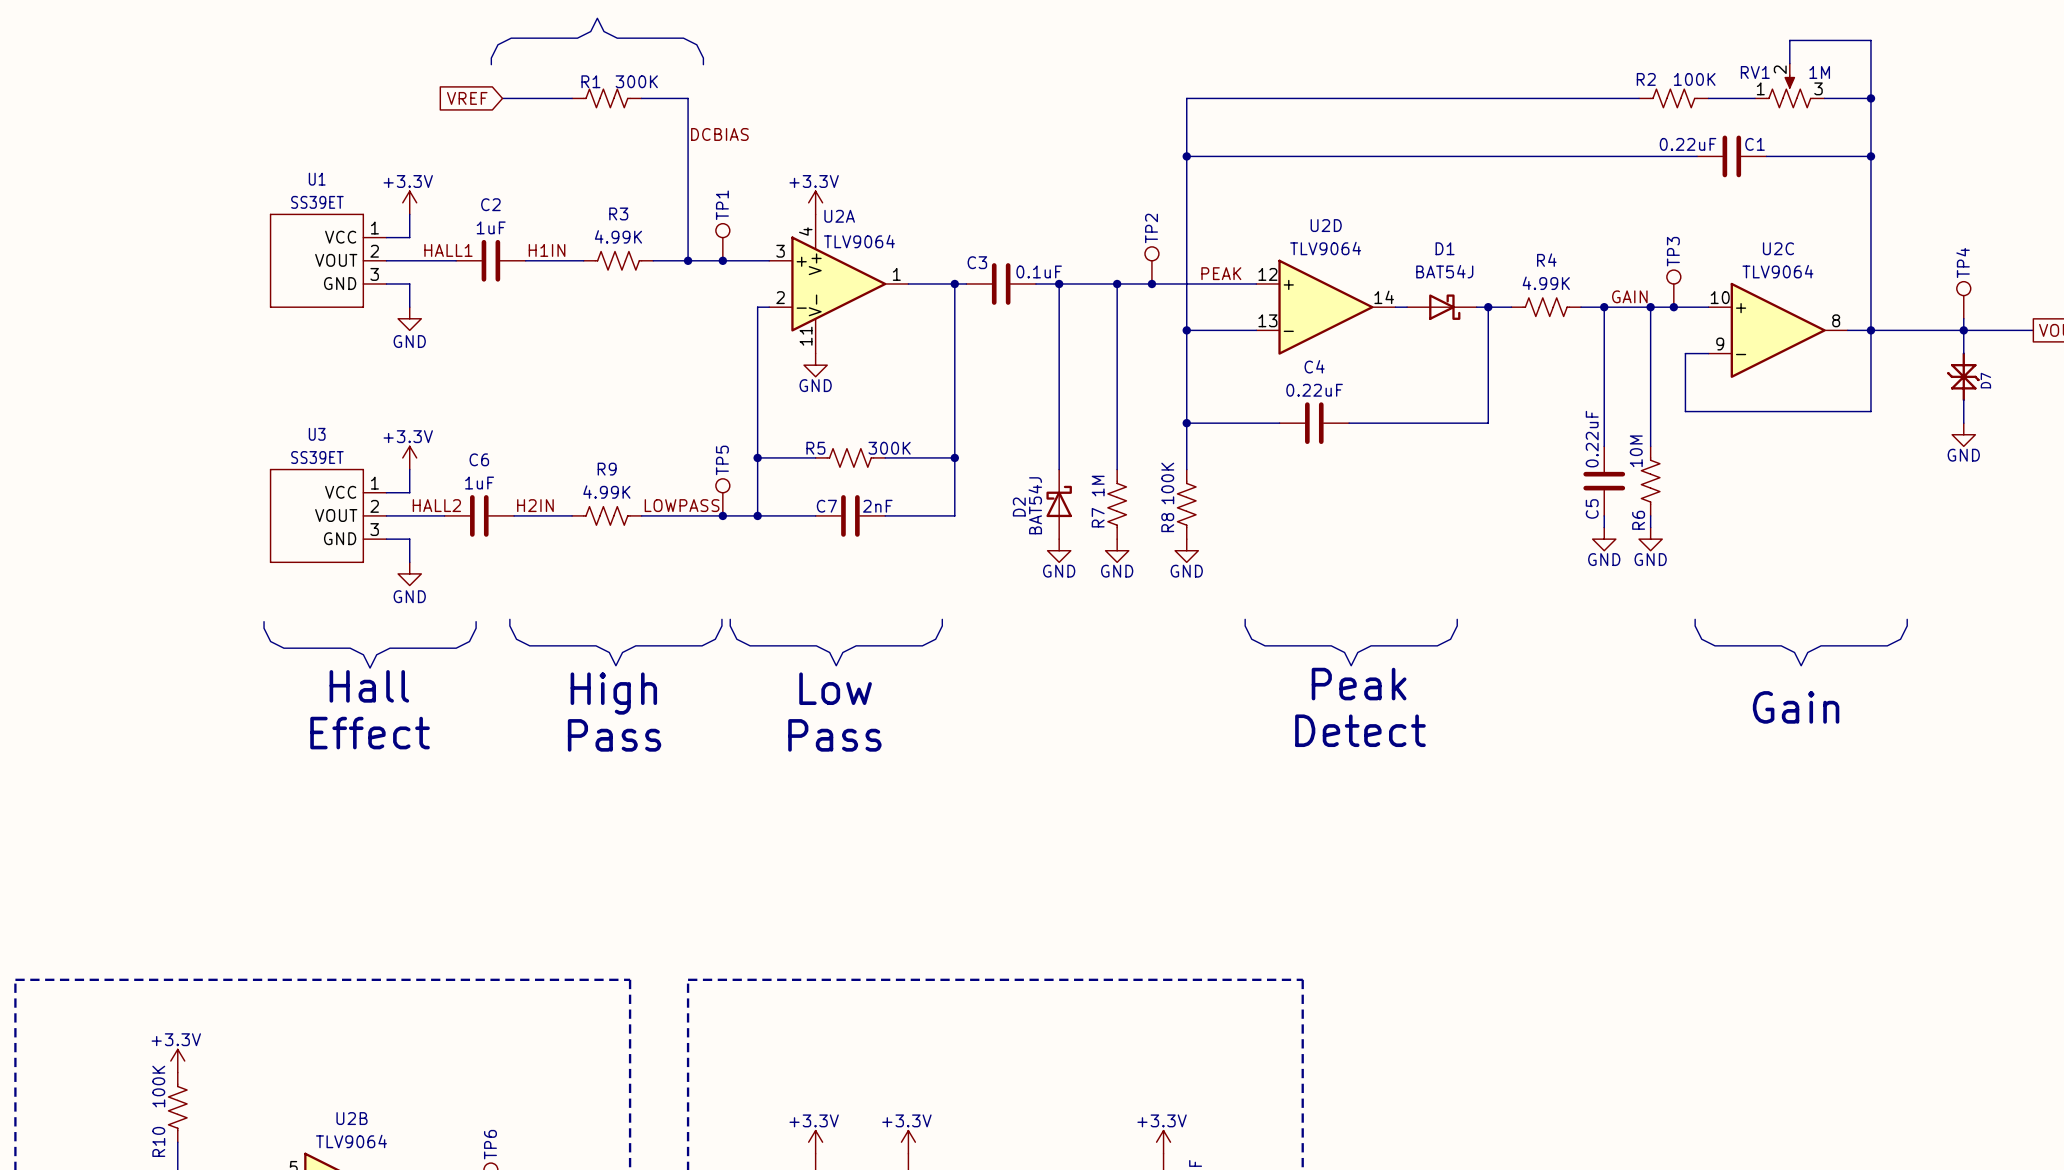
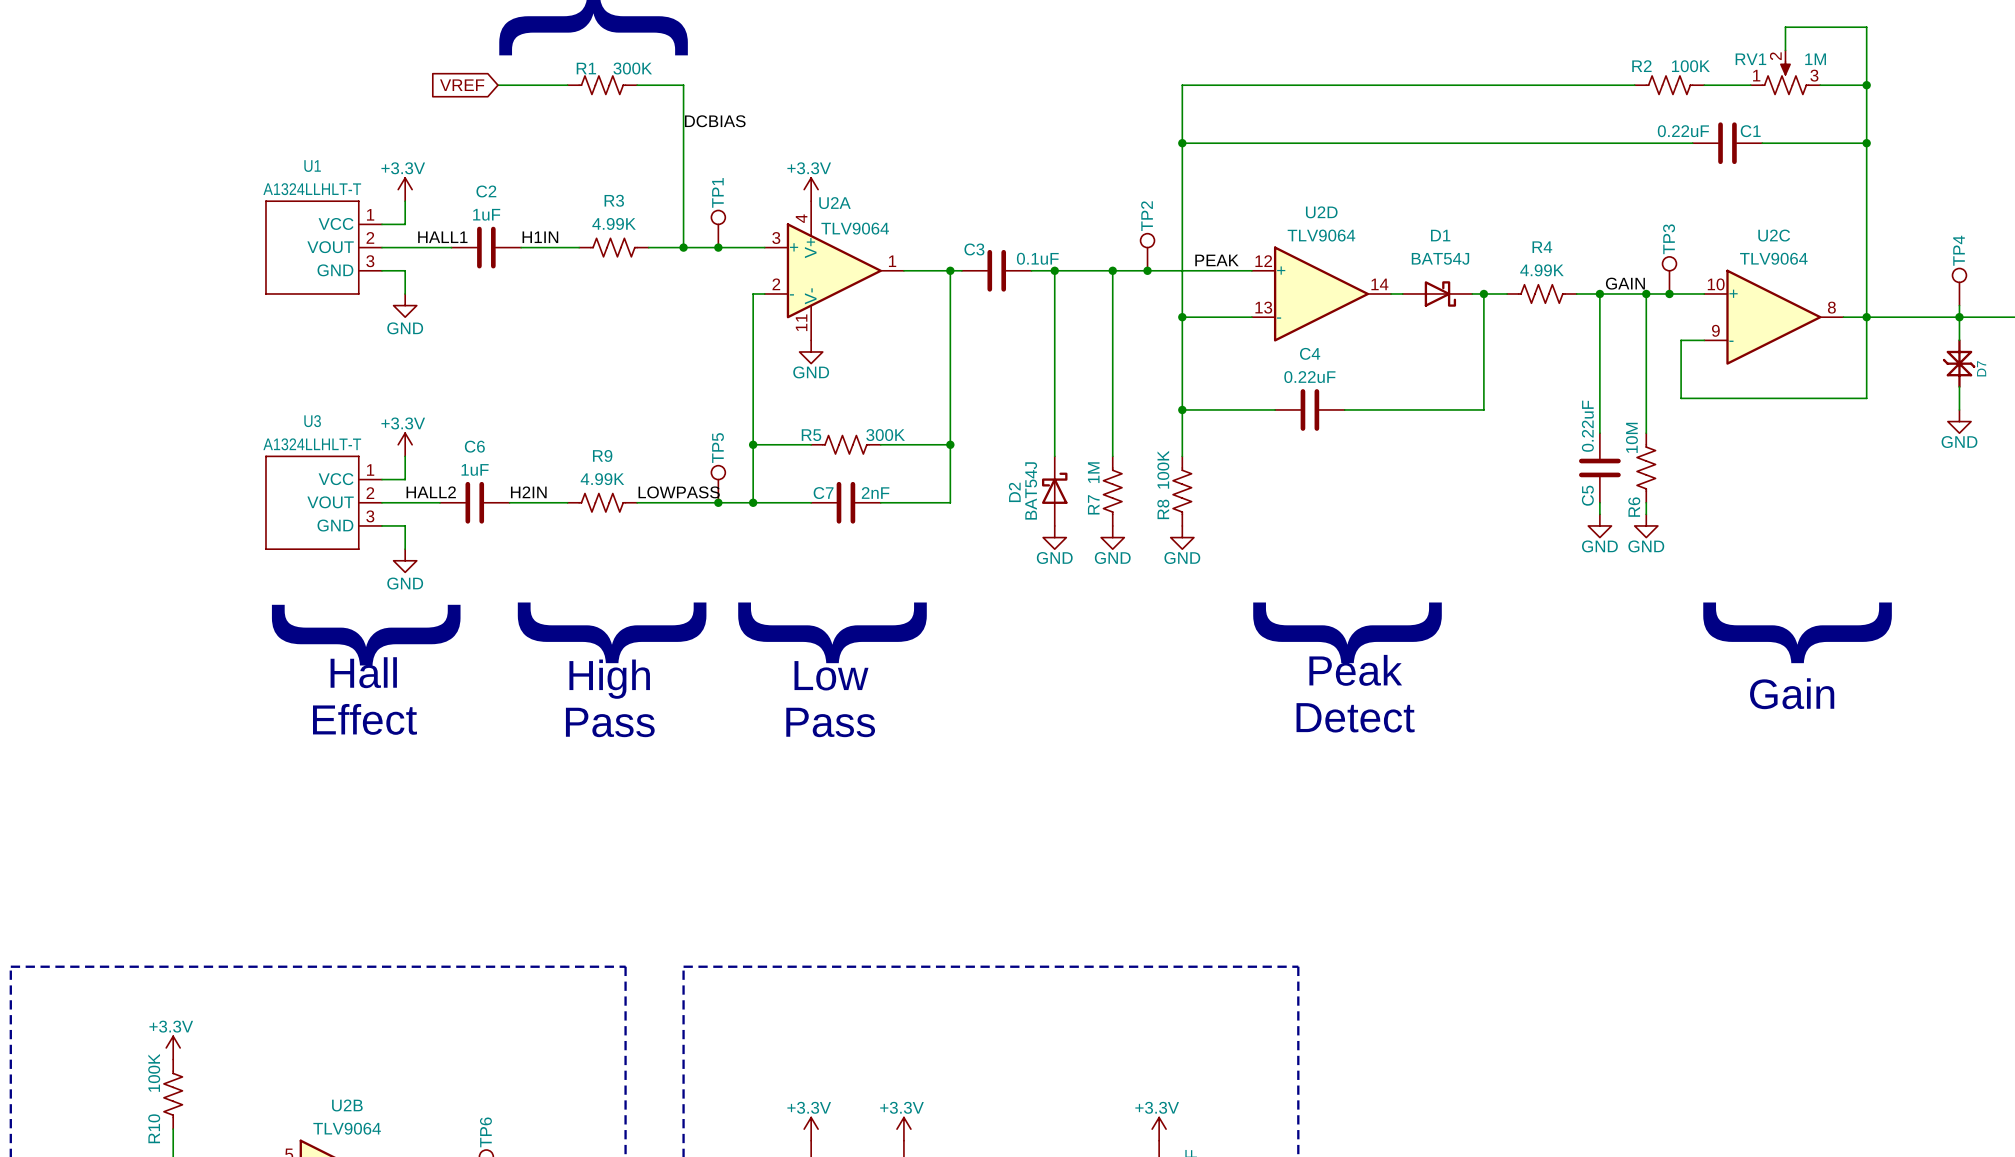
U1 value: SS39ET (317, 202) -> A1324LLHLT-T (312, 189)
U3 value: SS39ET (317, 457) -> A1324LLHLT-T (312, 444)

